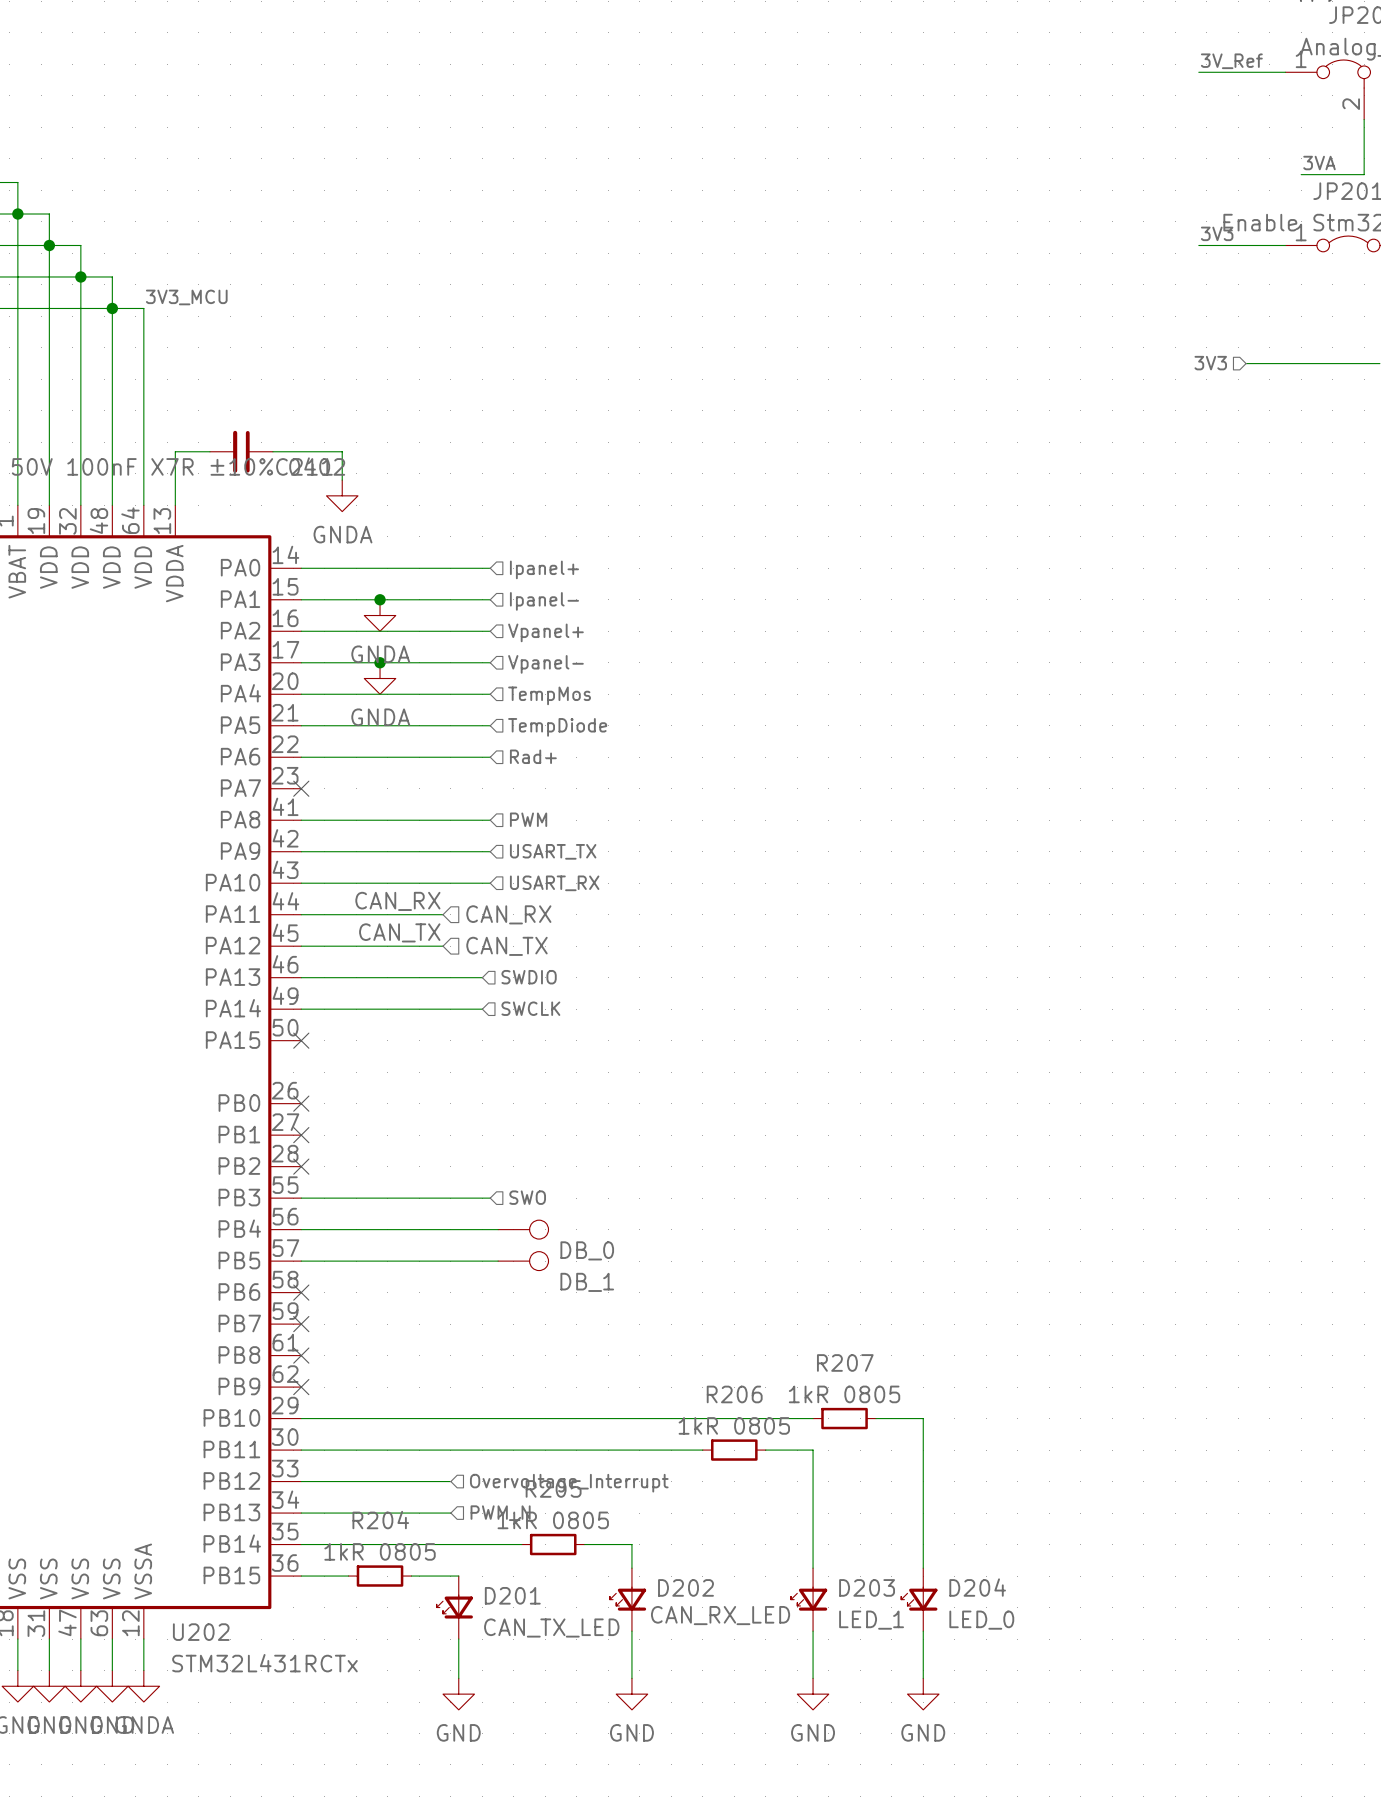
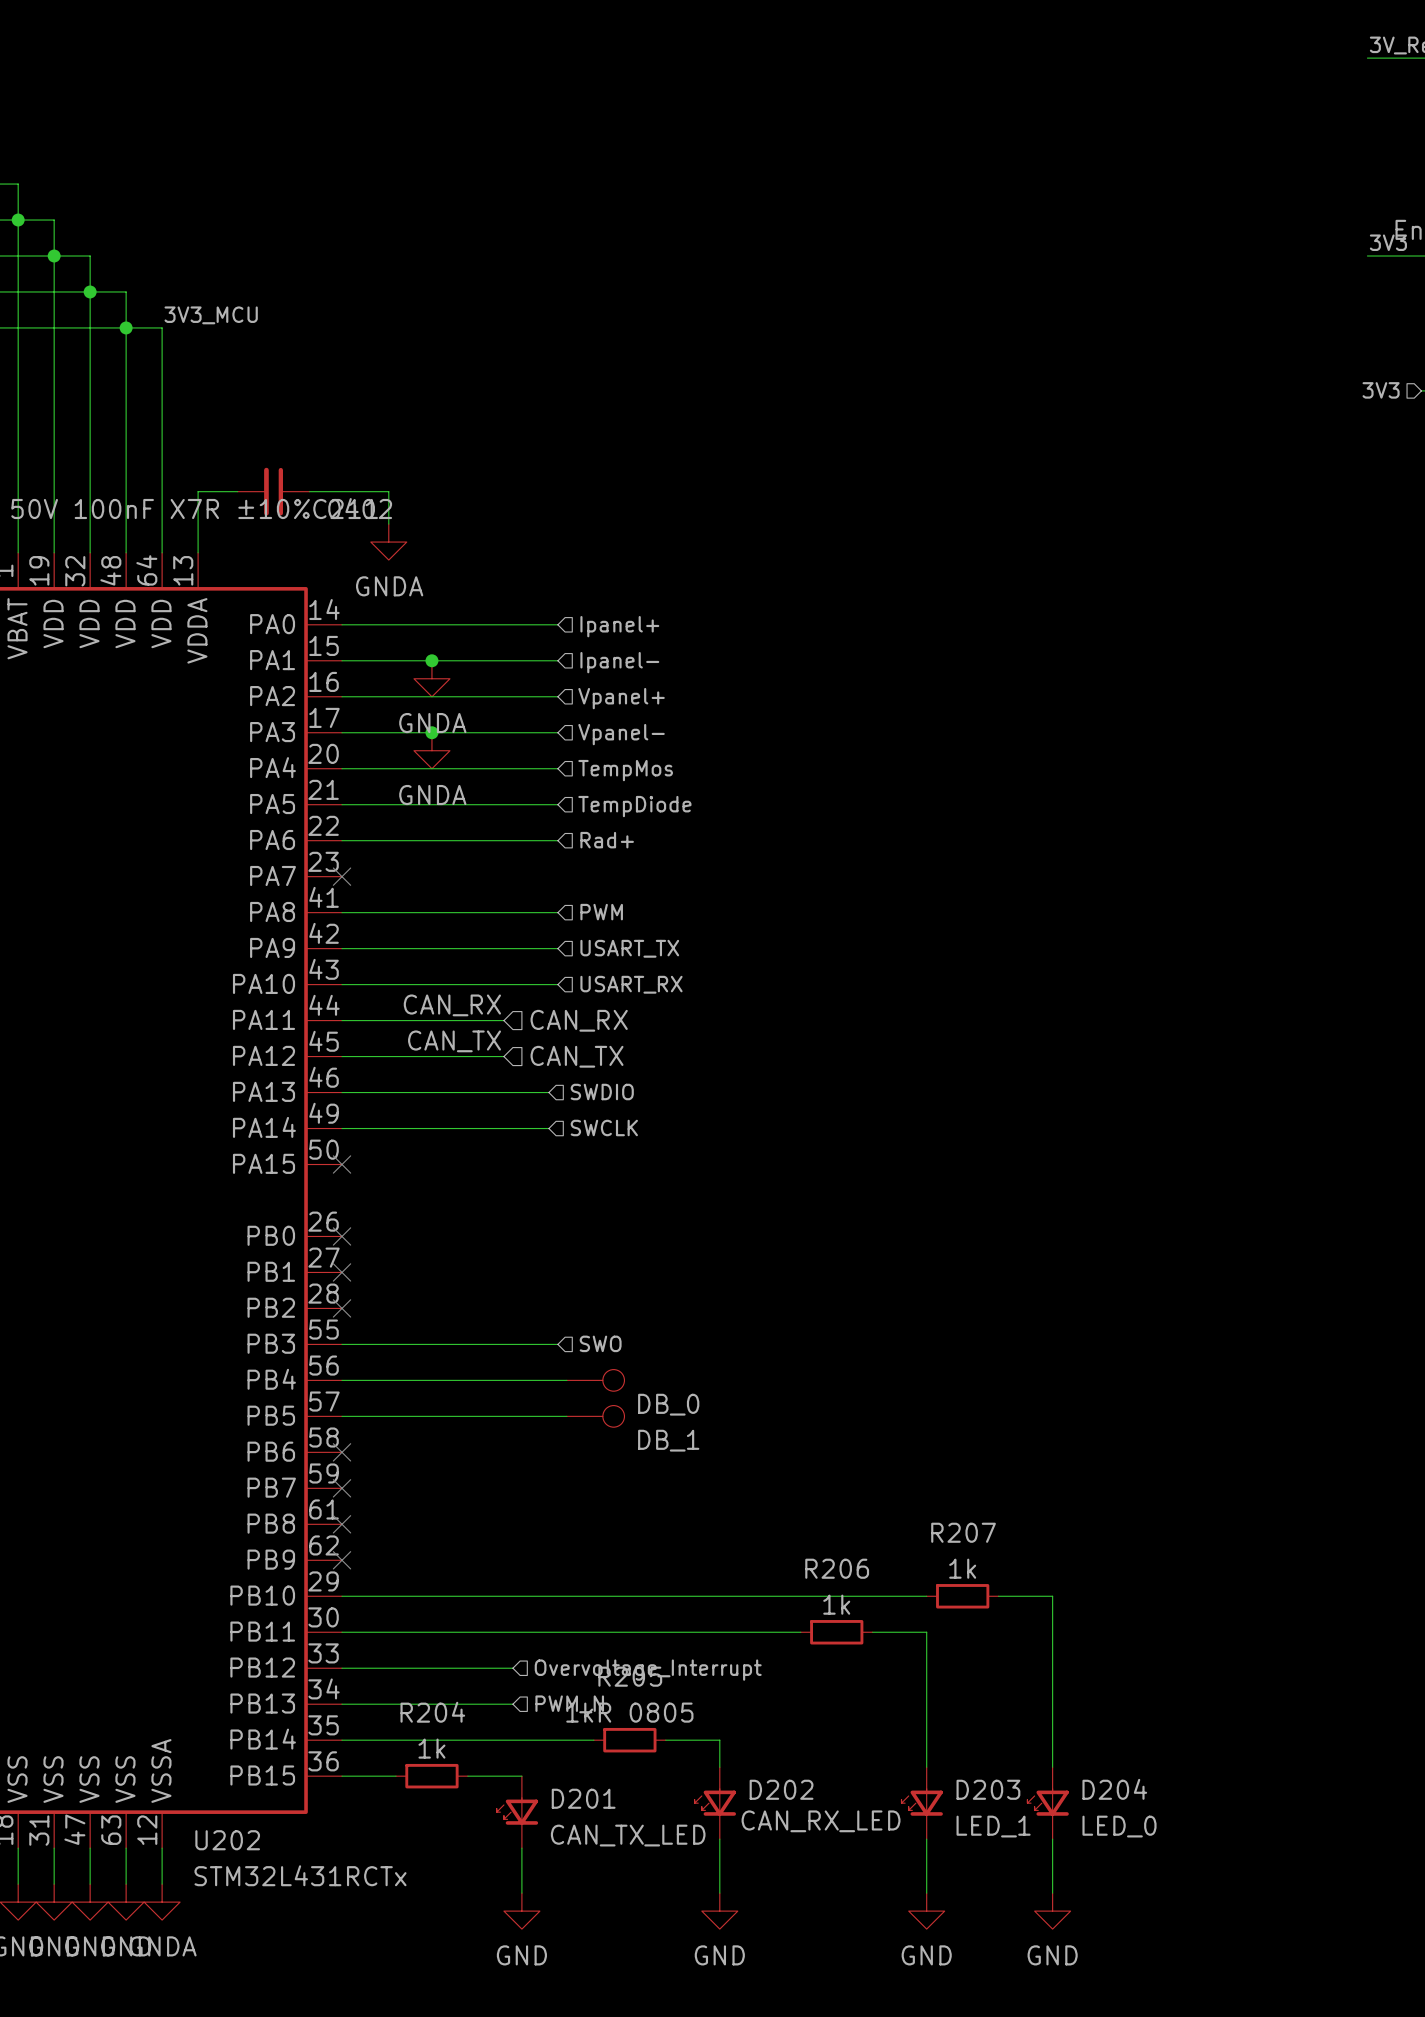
R207 value: 1kR 0805 (844, 1394) -> 1k (962, 1568)
R206 value: 1kR 0805 (734, 1425) -> 1k (836, 1604)
R204 value: 1kR 0805 (380, 1551) -> 1k (431, 1748)

